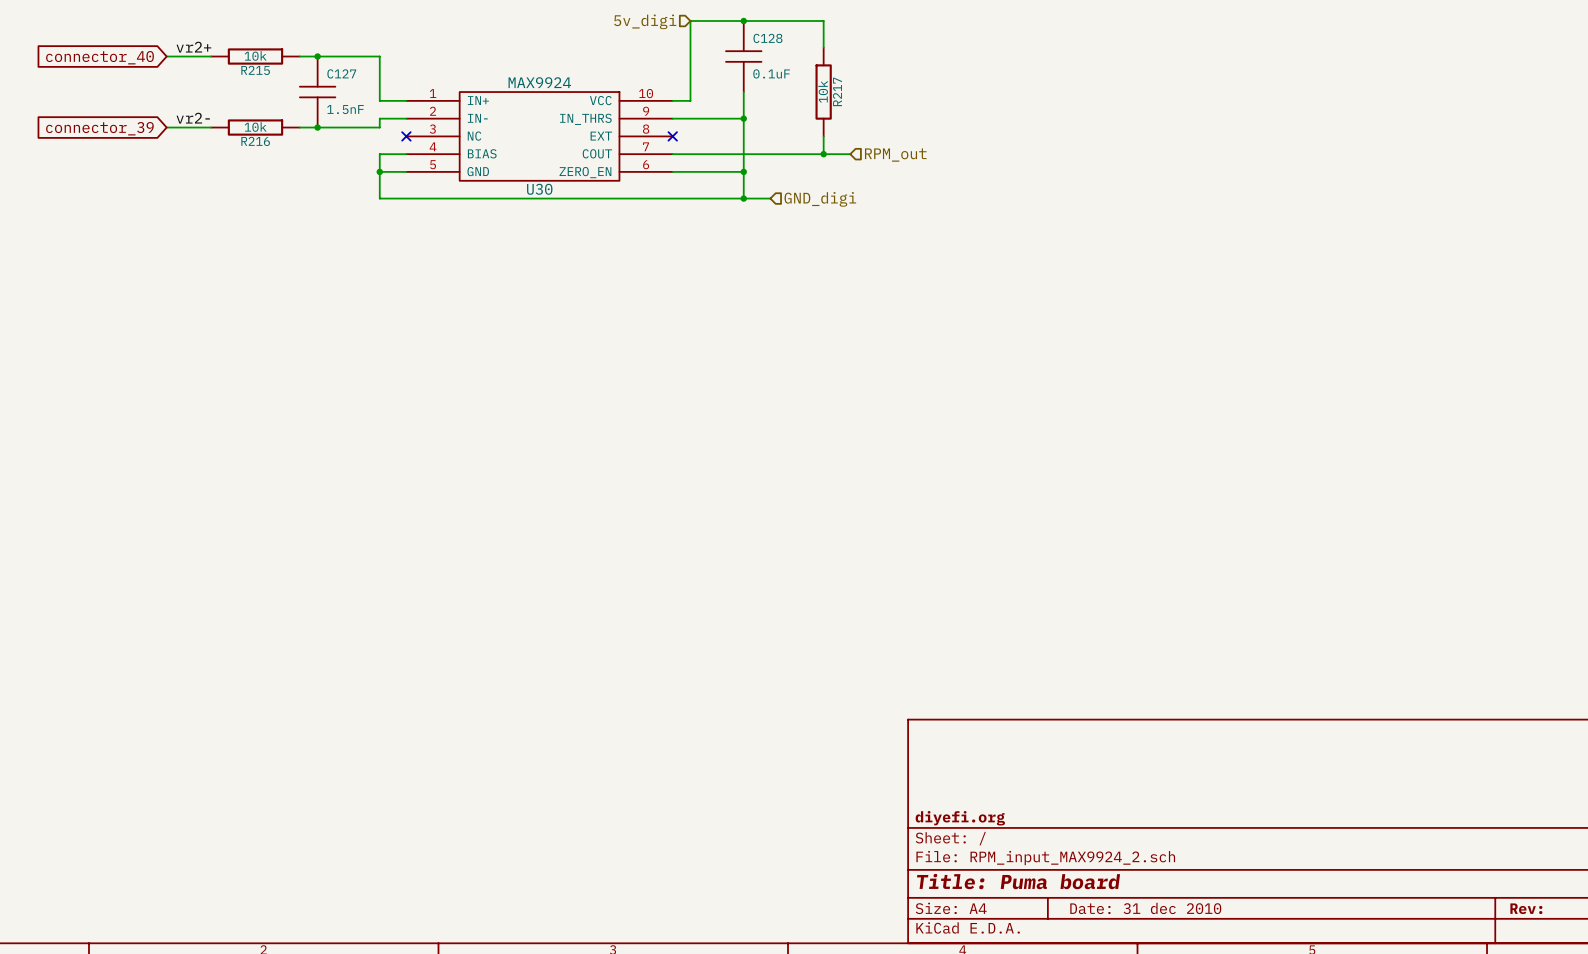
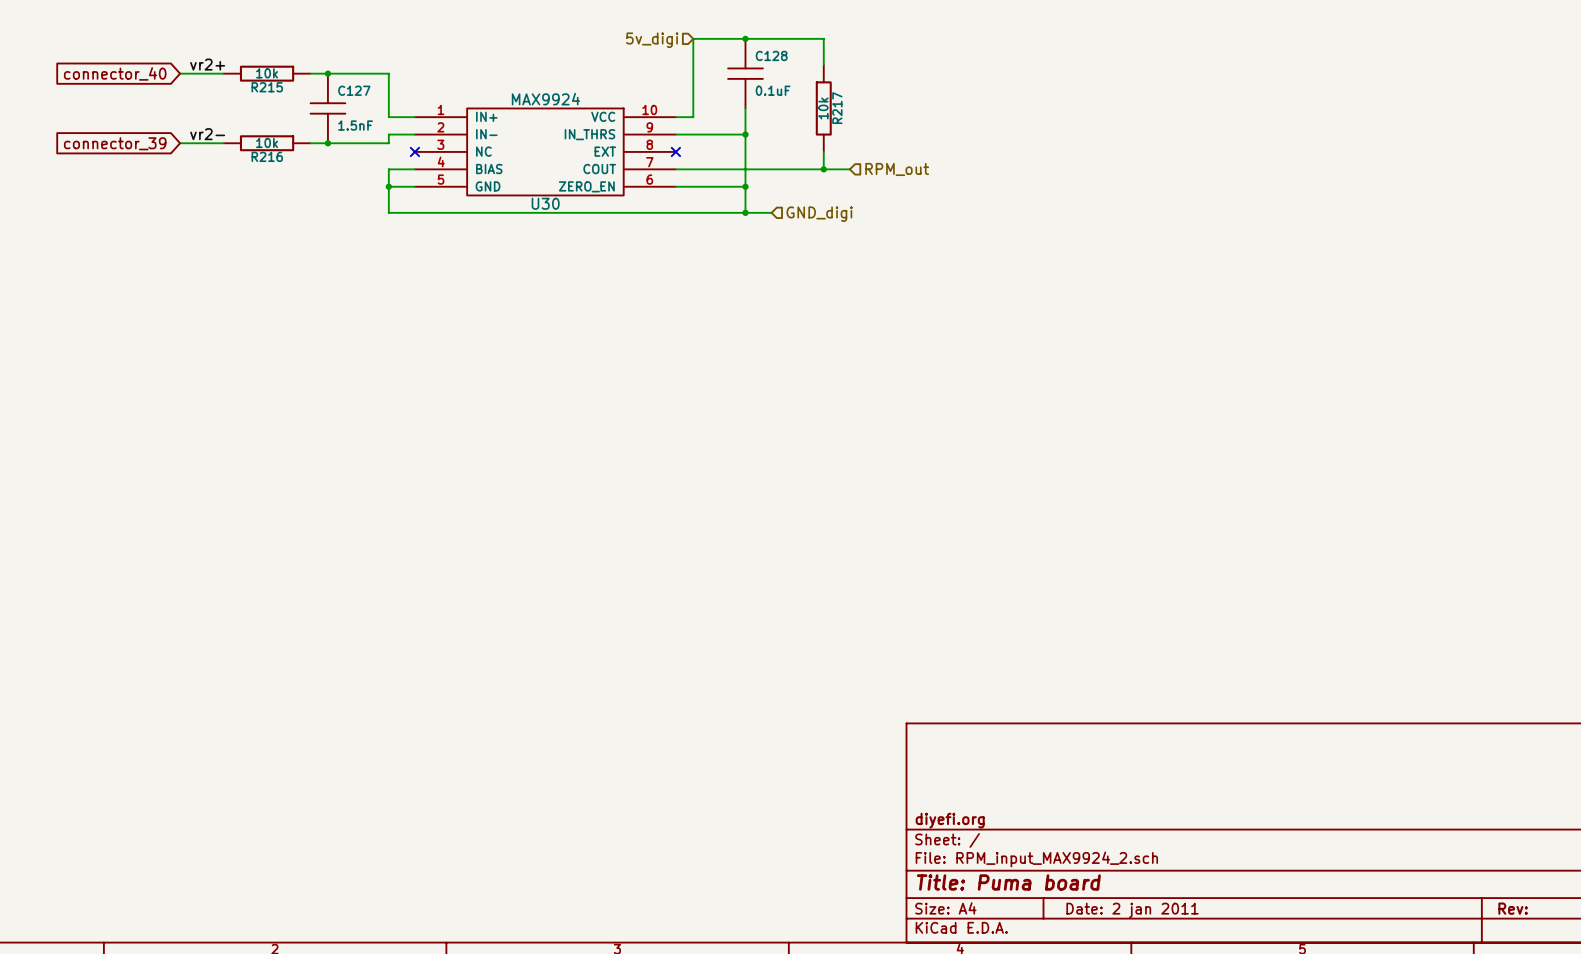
title block: Date: 31 dec 2010 (1145, 908) -> Date: 2 jan 2011 (1132, 910)

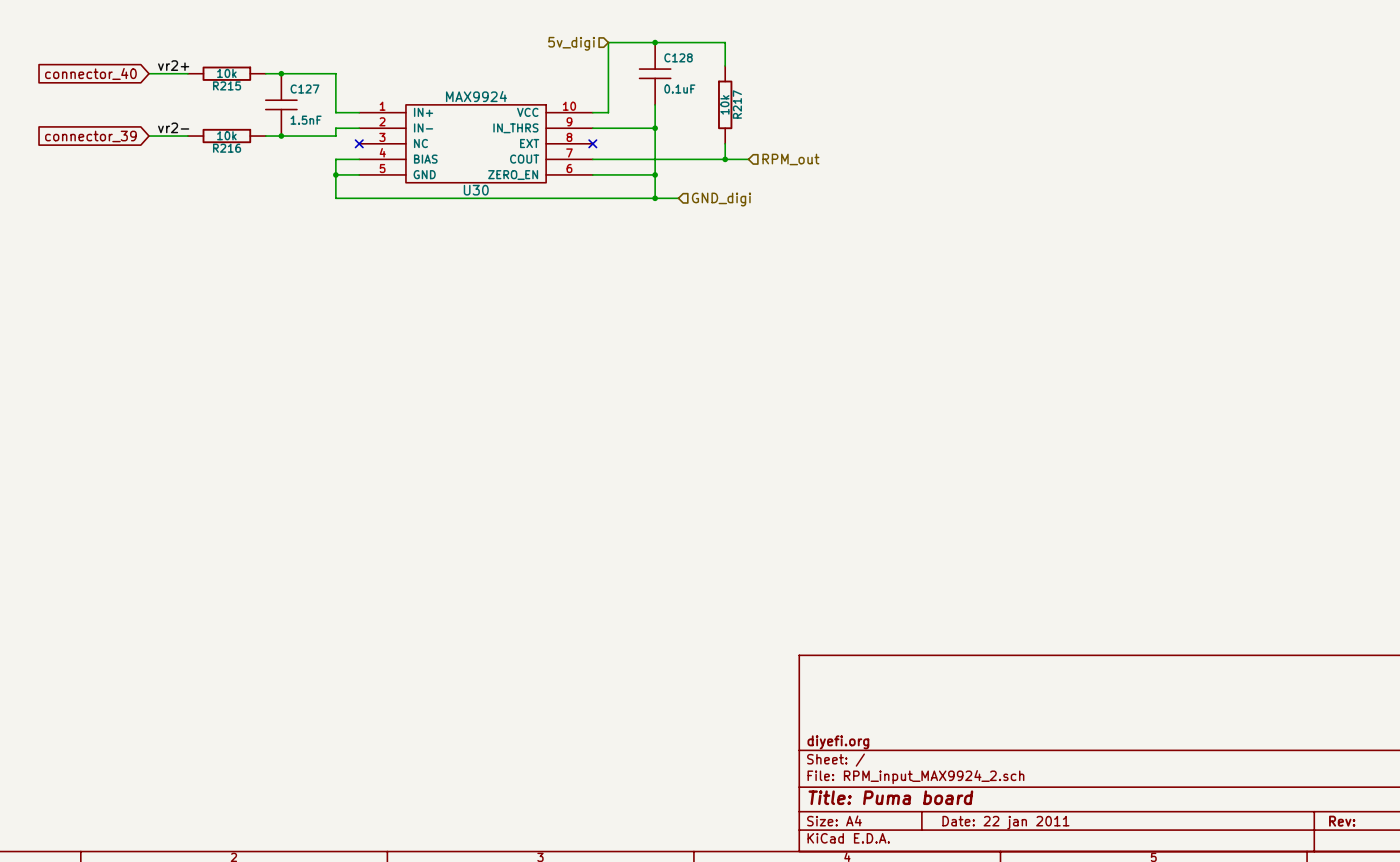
title block: Date: 2 jan 2011 (1132, 910) -> Date: 22 jan 2011 (1005, 822)

